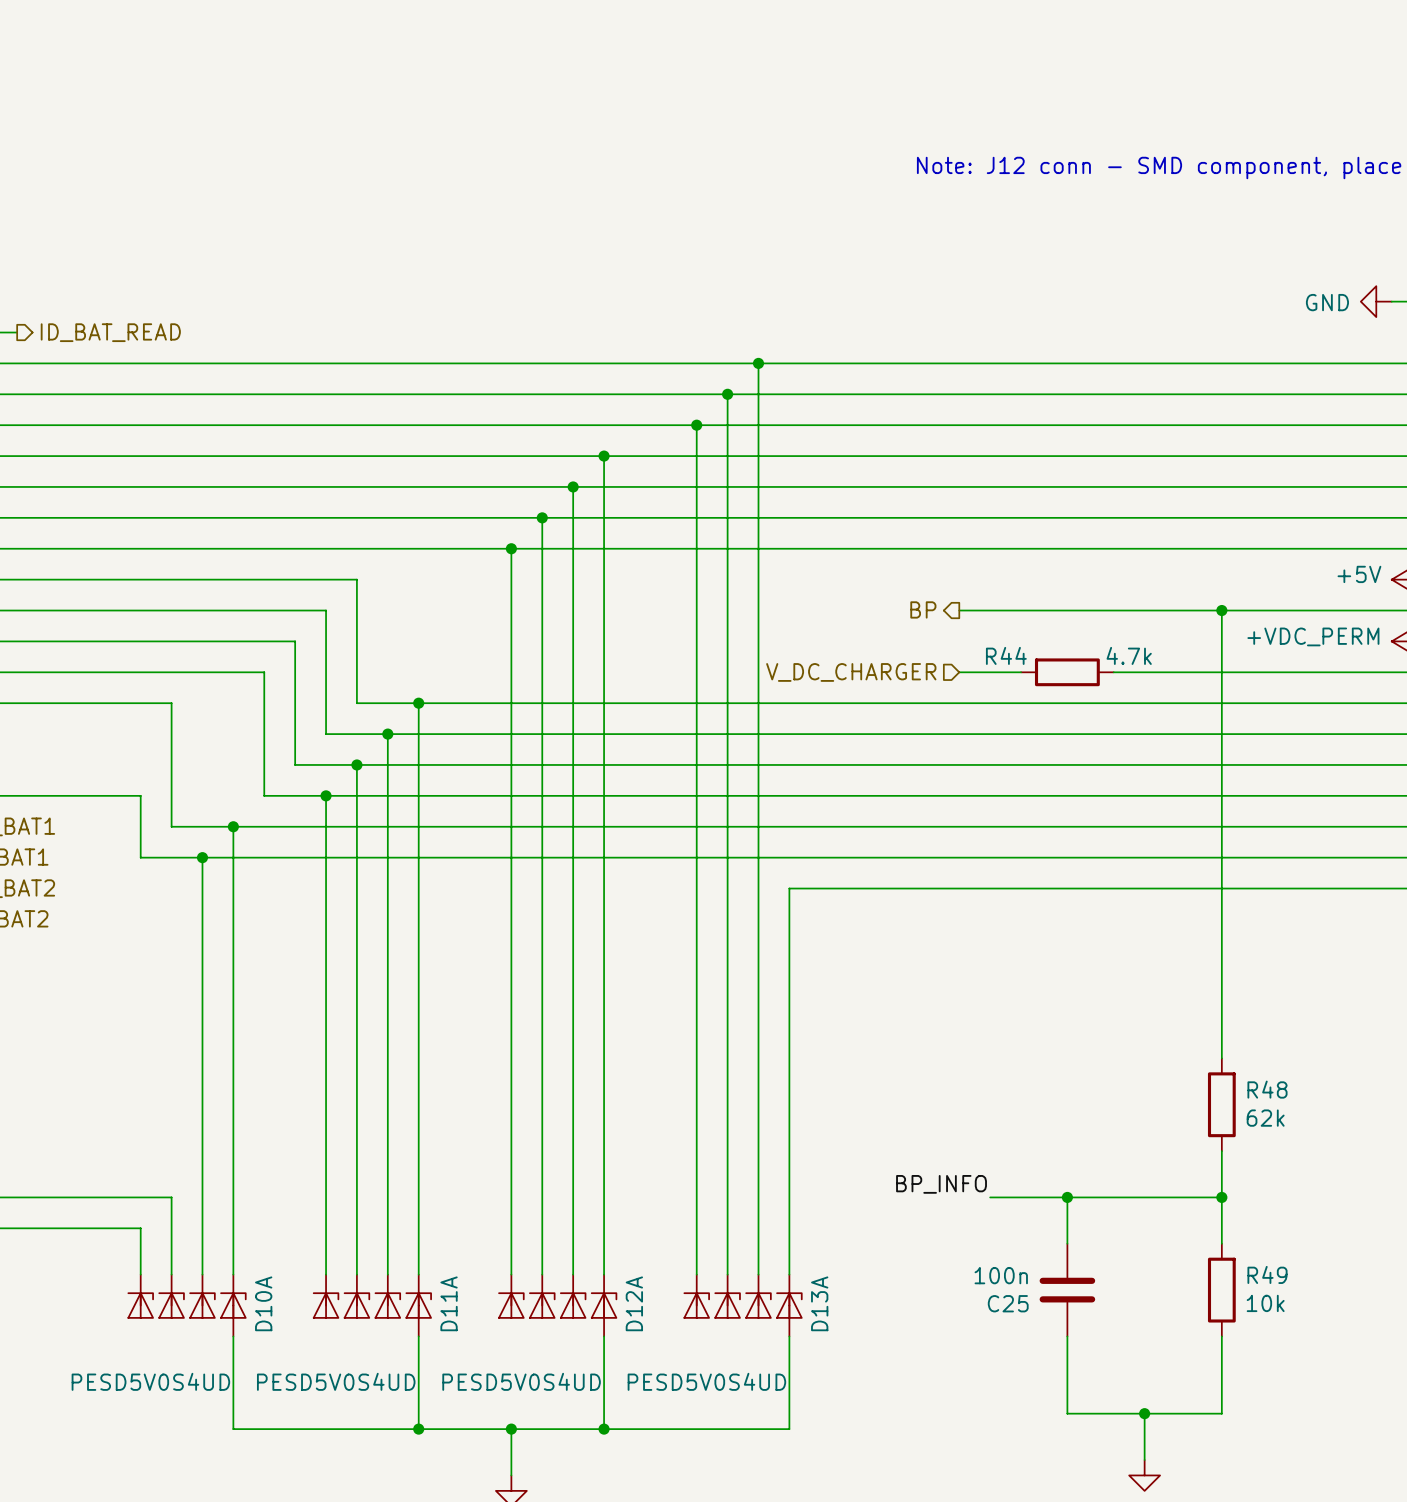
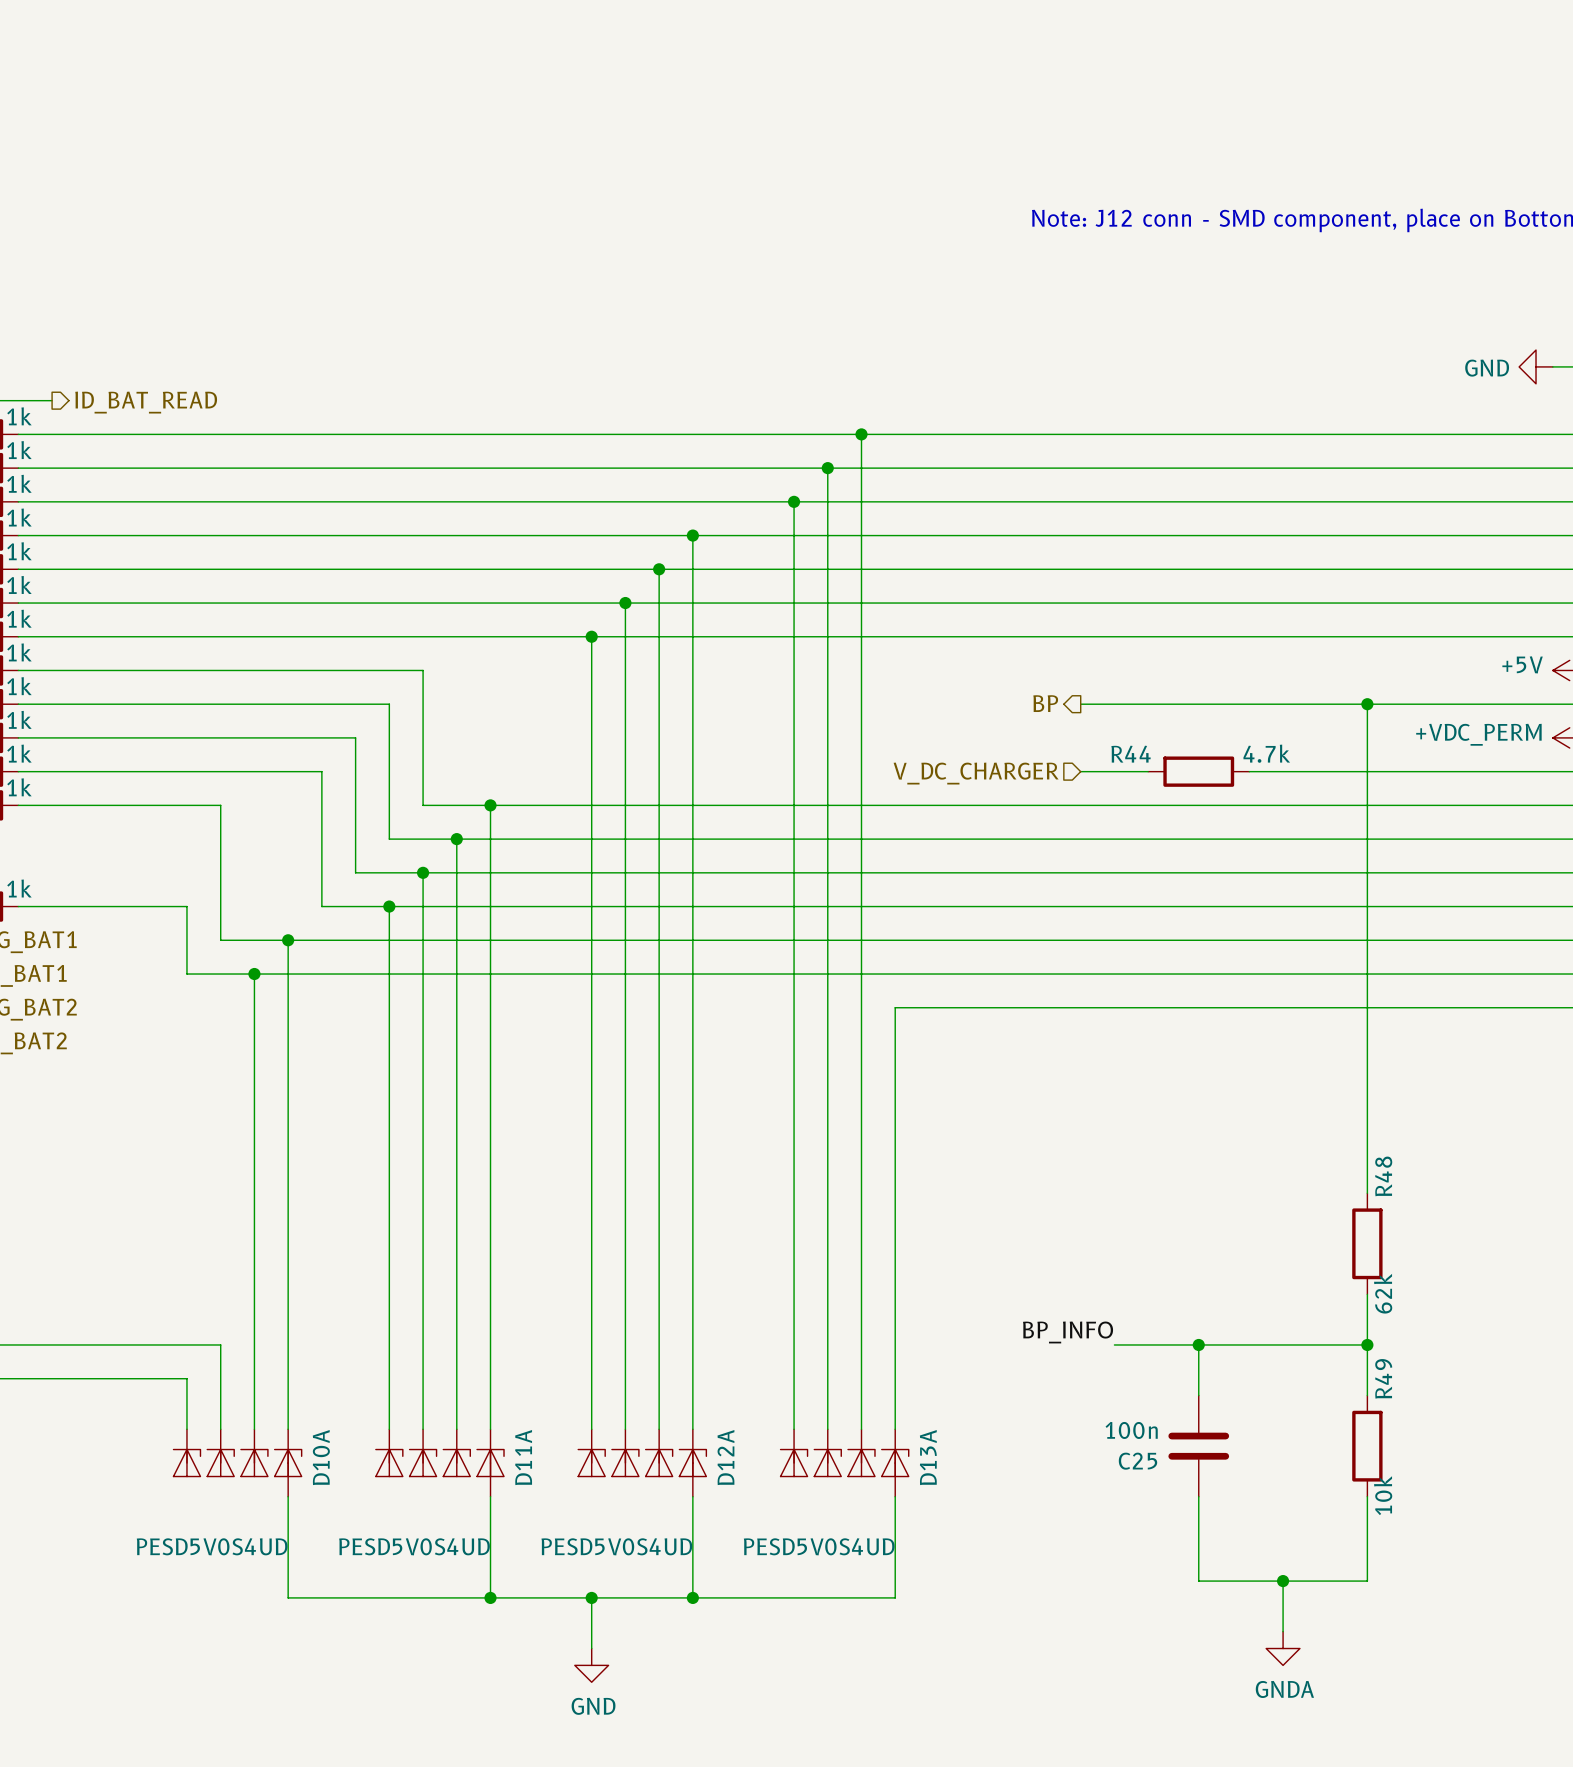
R48 name rotation: 0° (1267, 1089) -> 90° counterclockwise (1383, 1176)
R48 name position: R48 (1267, 1089) -> R48 (1383, 1176)
R48 value rotation: 0° (1265, 1118) -> 90° counterclockwise (1383, 1293)
R49 name rotation: 0° (1267, 1274) -> 90° counterclockwise (1383, 1378)
R49 name position: R49 (1267, 1274) -> R49 (1383, 1378)
R49 value rotation: 0° (1265, 1303) -> 90° counterclockwise (1383, 1495)

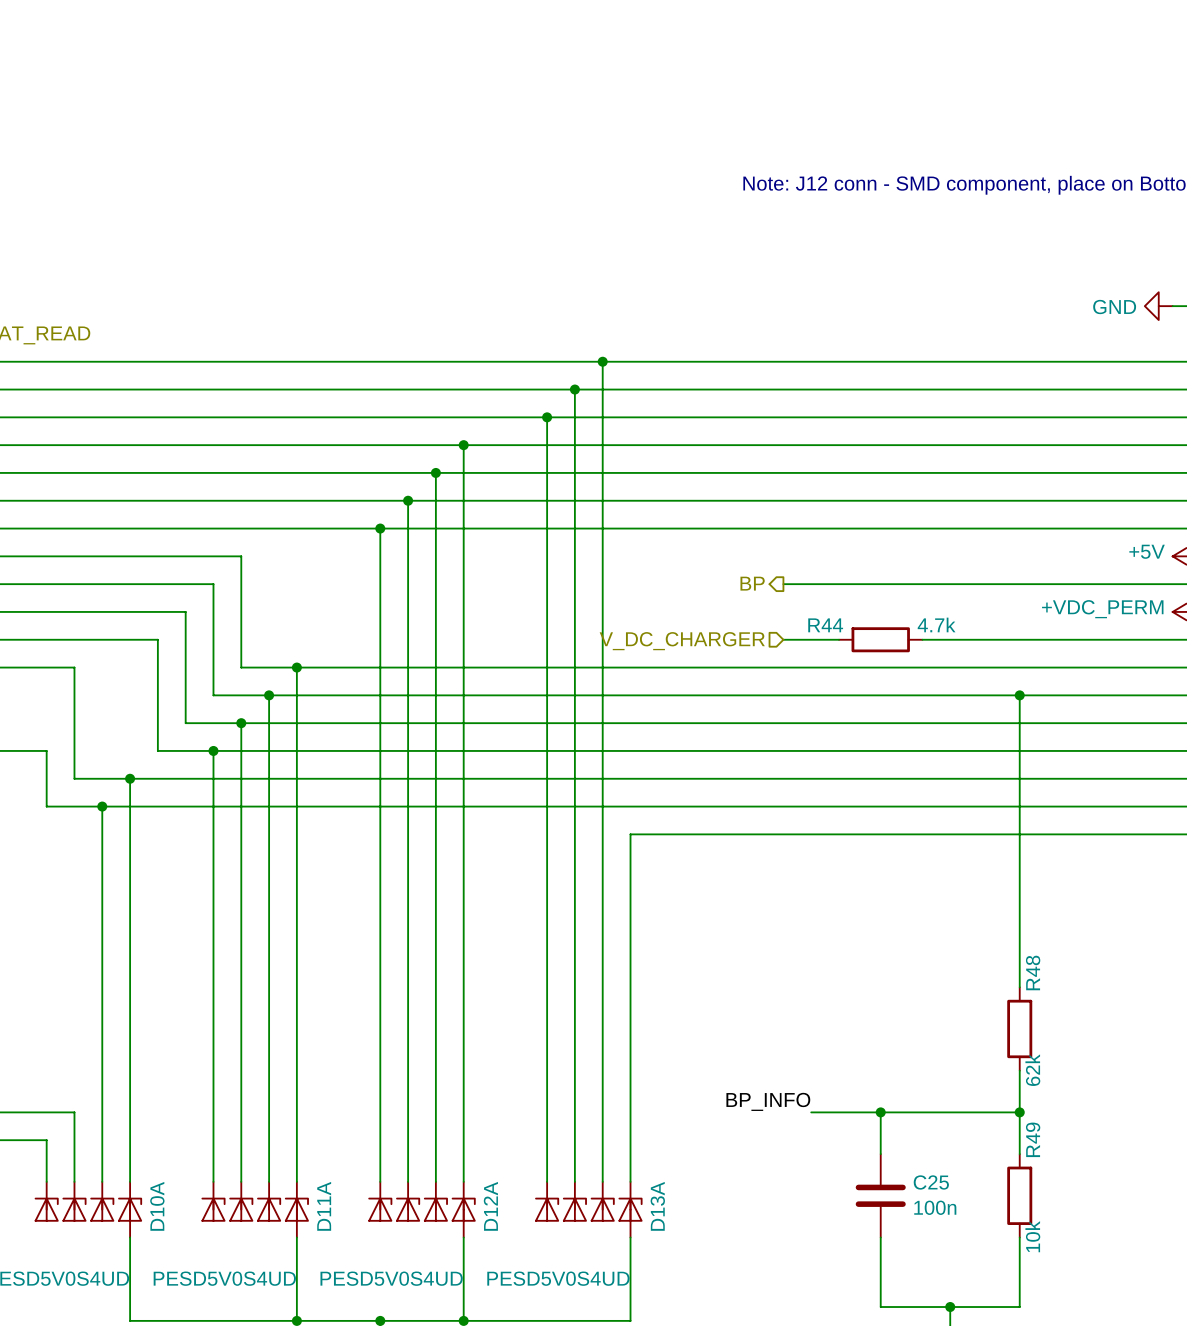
wire: (1367, 704) (1367, 839) -> none
junction: (1367, 704) -> none
junction: none -> (1019, 695)
C25 value position: 100n (1131, 1430) -> 100n (935, 1207)
C25 name position: C25 (1137, 1461) -> C25 (931, 1182)

